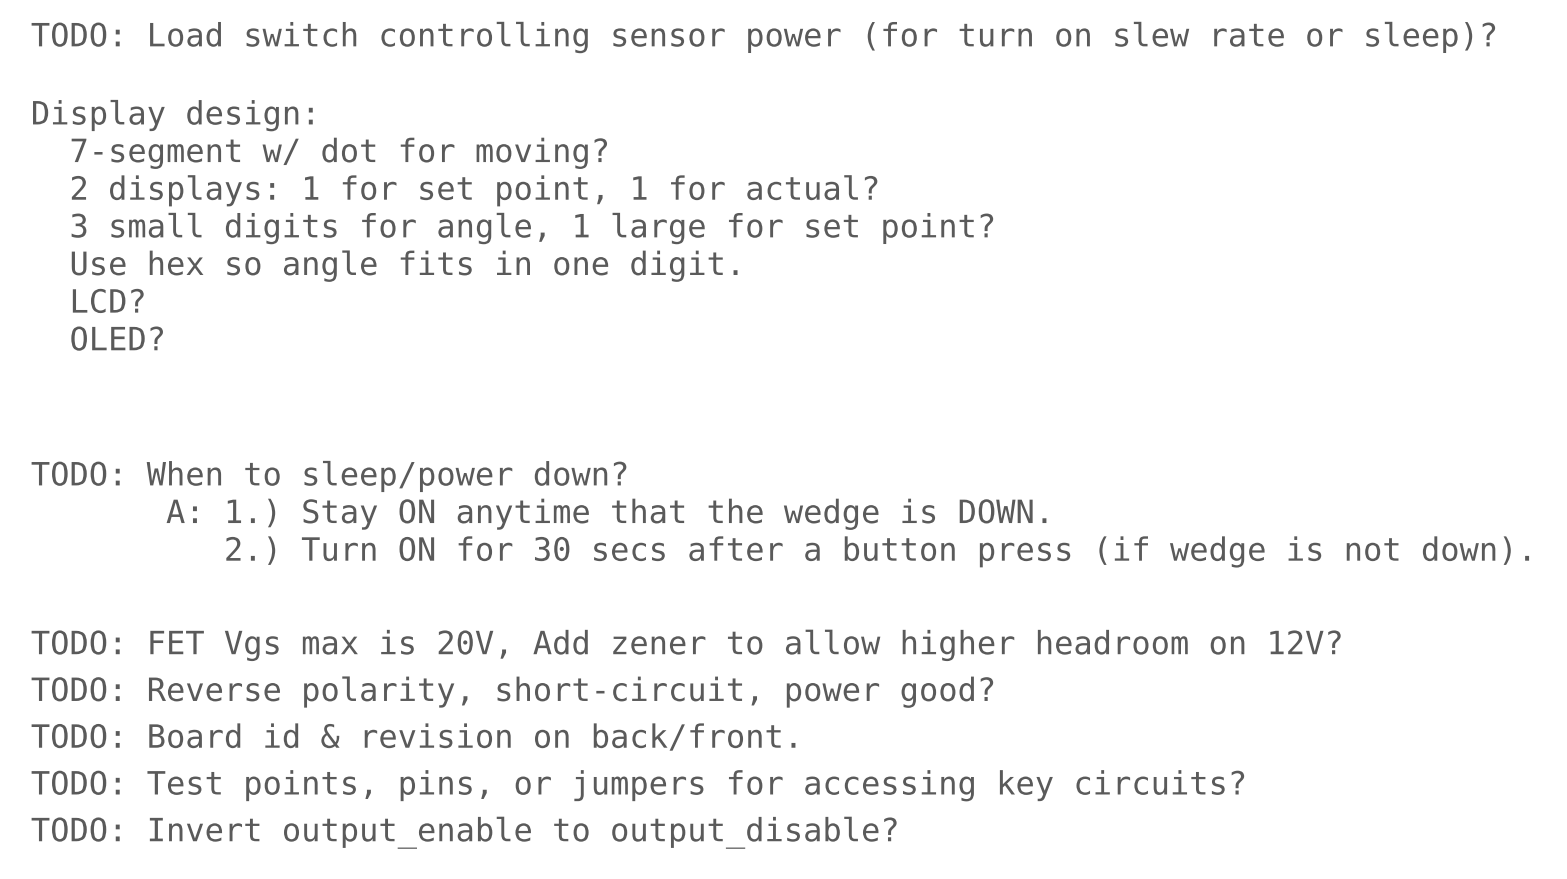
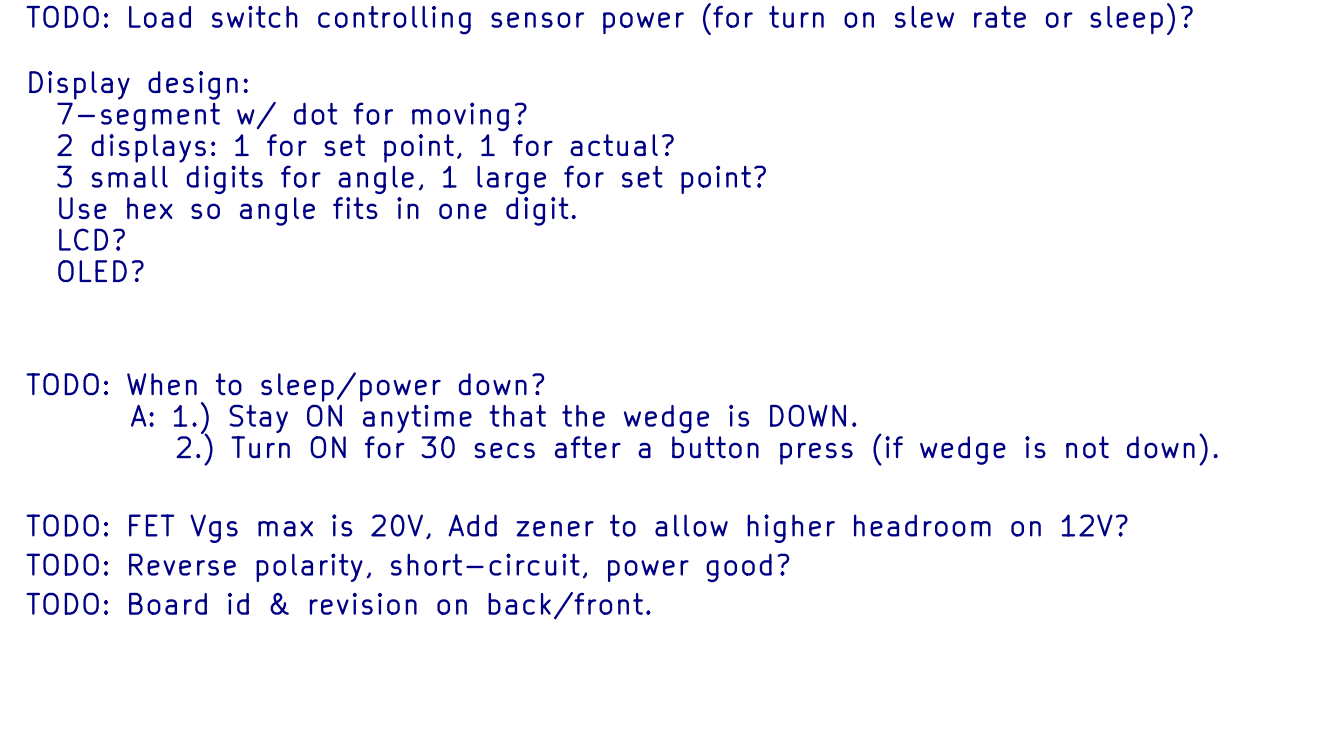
text: TODO: Test points, pins, or jumpers for accessing key circuits? (637, 785) -> none
text: TODO: Invert output_enable to output_disable? (464, 832) -> none

